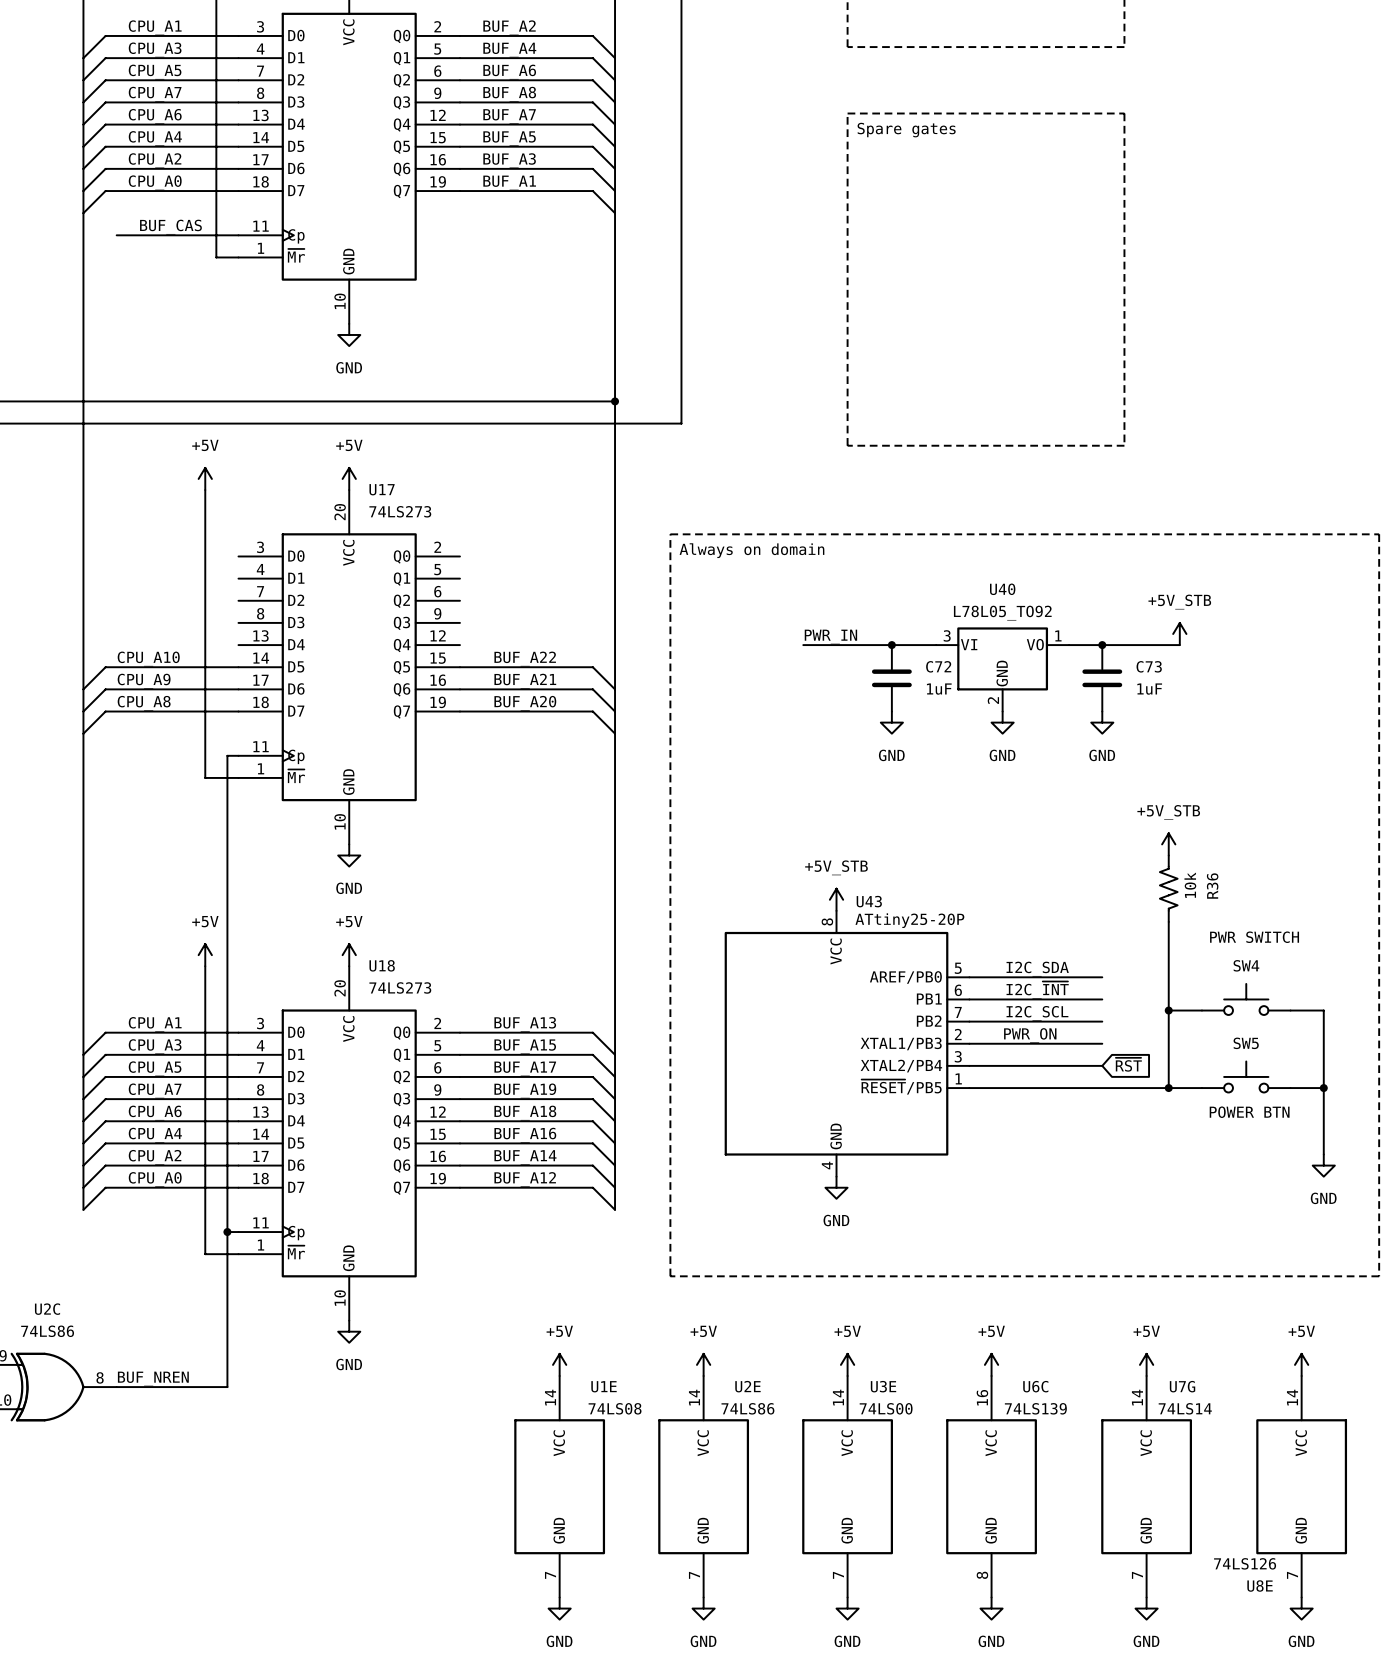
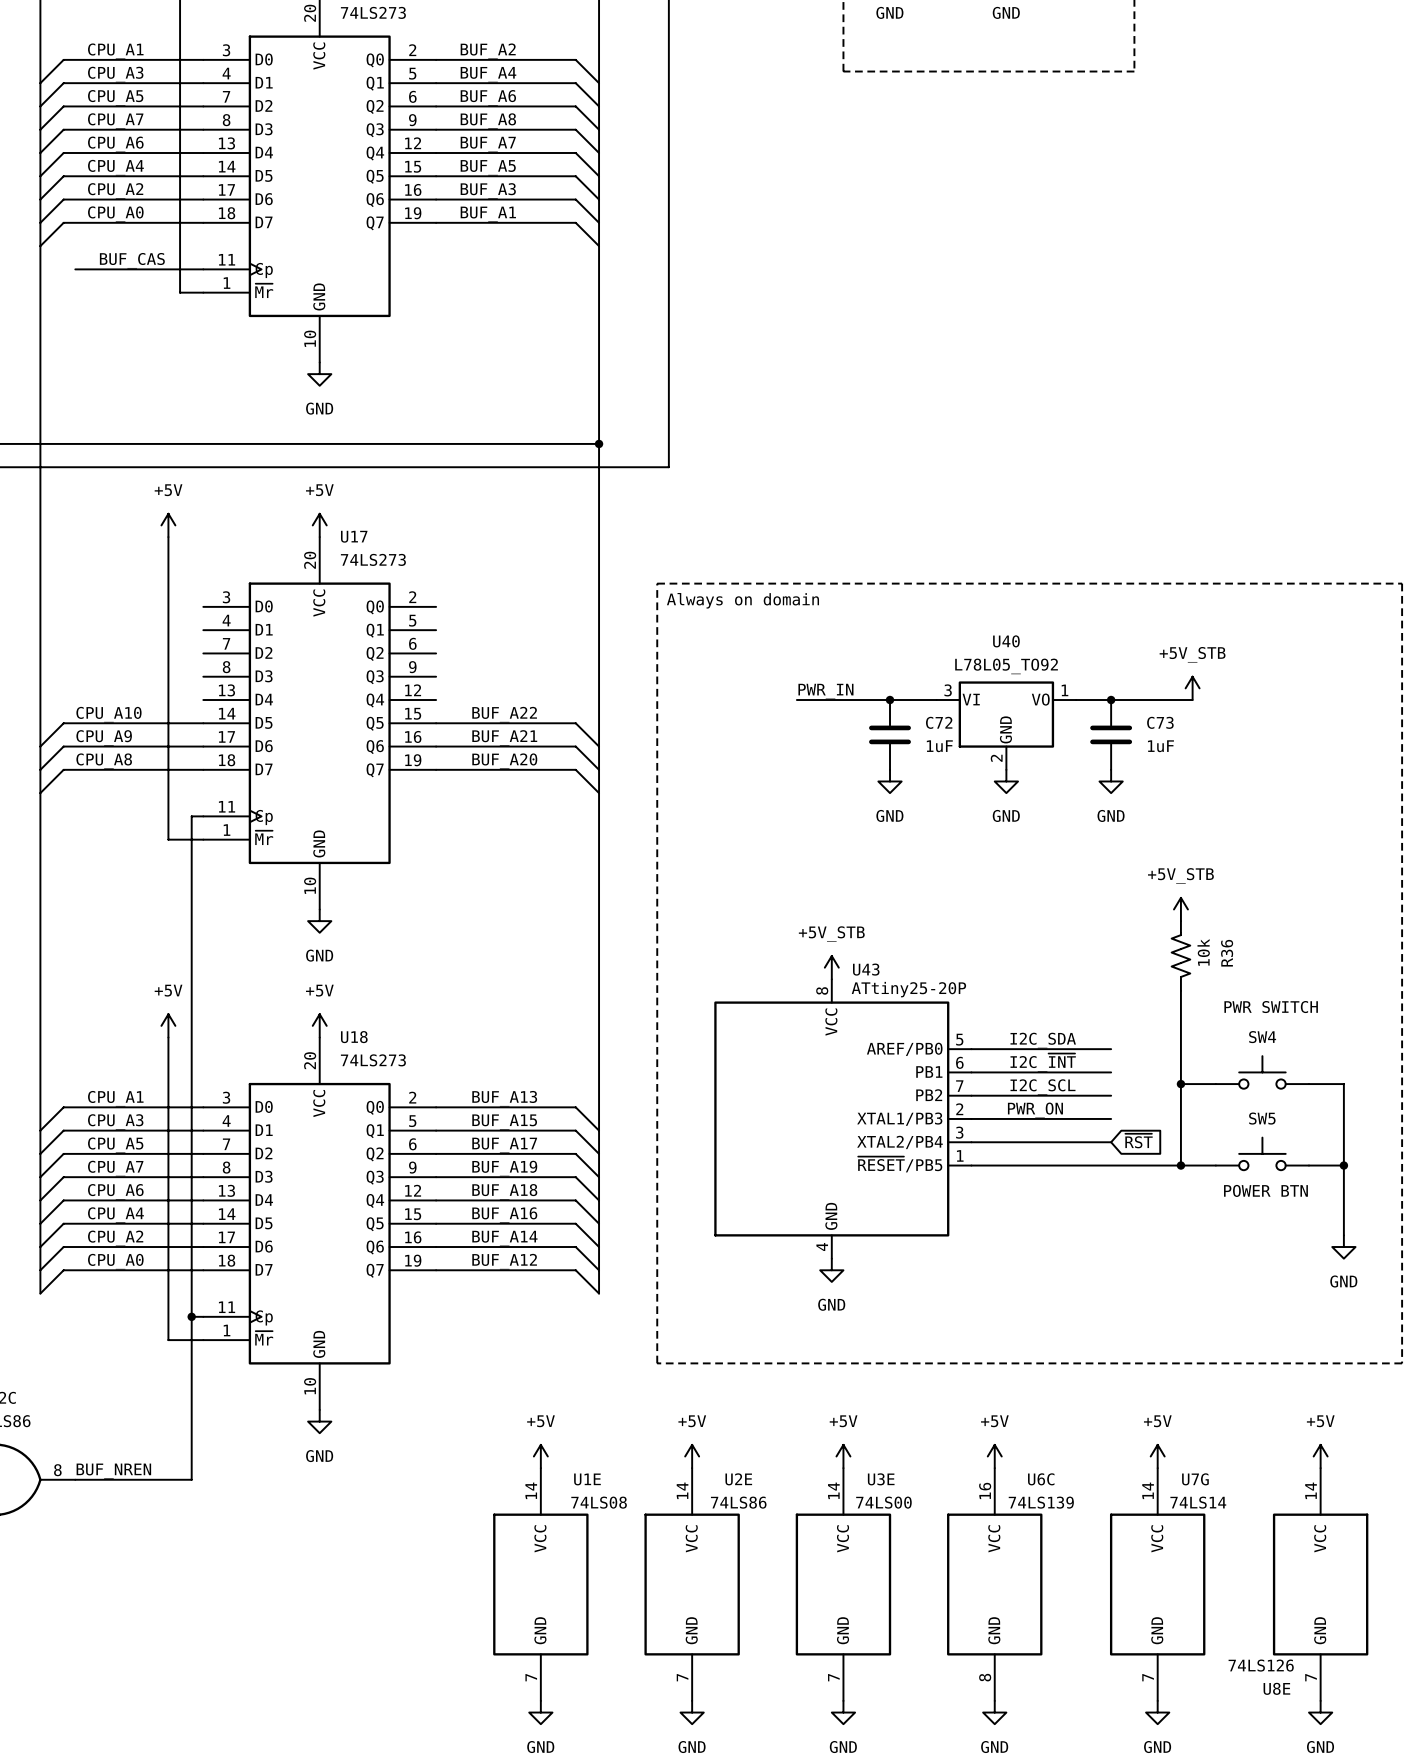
line: (847, 113) (1124, 113) (1124, 445) (847, 445) (847, 113) -> none
text: Spare gates (906, 130) -> none

